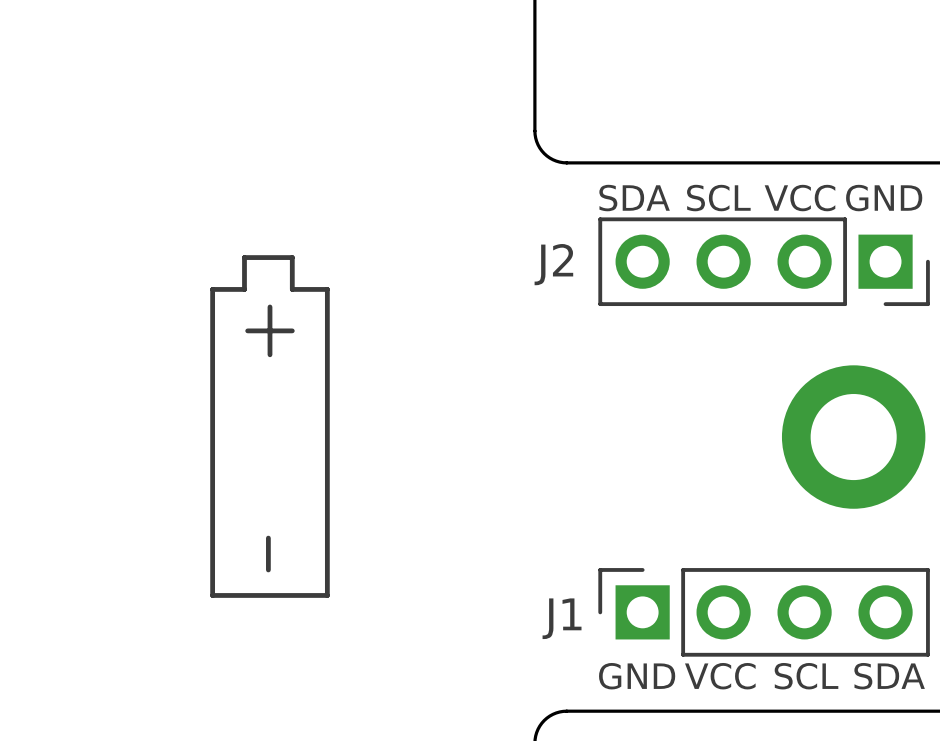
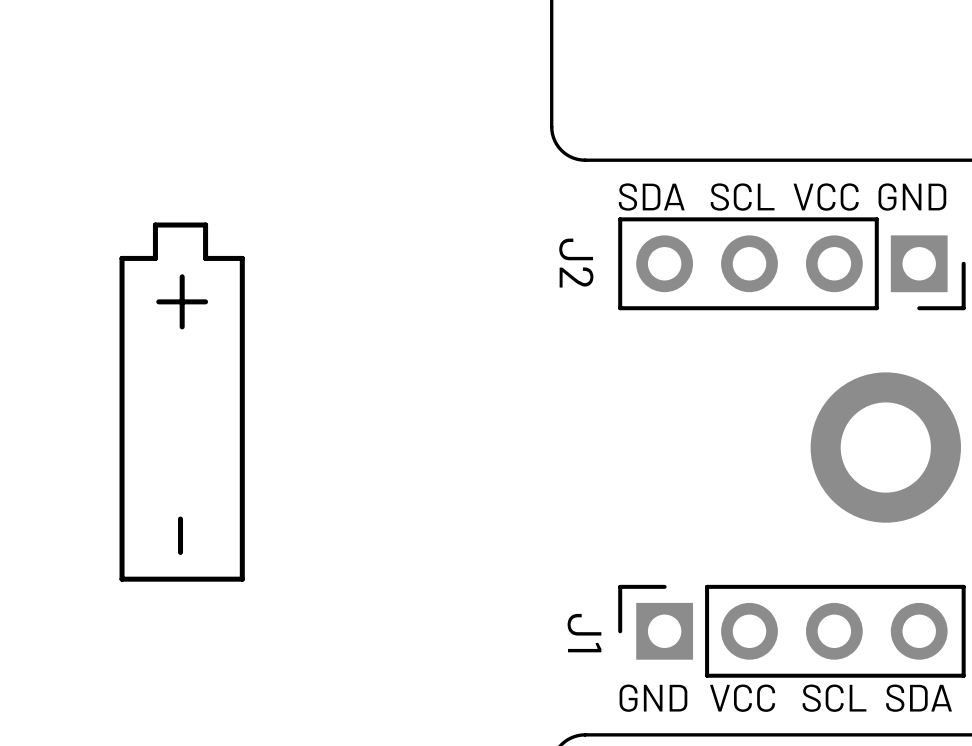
line: (292, 257) (244, 257) (244, 289) (212, 289) (212, 595) (327, 595) (327, 289) (292, 289) (292, 257) -> (205, 225) (155, 225) (155, 258) (122, 258) (122, 579) (242, 579) (242, 258) (205, 258) (205, 225)
J2 name rotation: 0° (553, 264) -> 90° clockwise (576, 263)
line: (269, 306) (269, 354) -> (182, 276) (182, 326)
line: (292, 330) (247, 330) -> (205, 301) (158, 301)
line: (268, 538) (268, 569) -> (180, 519) (180, 552)
J1 name rotation: 0° (562, 618) -> 90° clockwise (584, 633)

